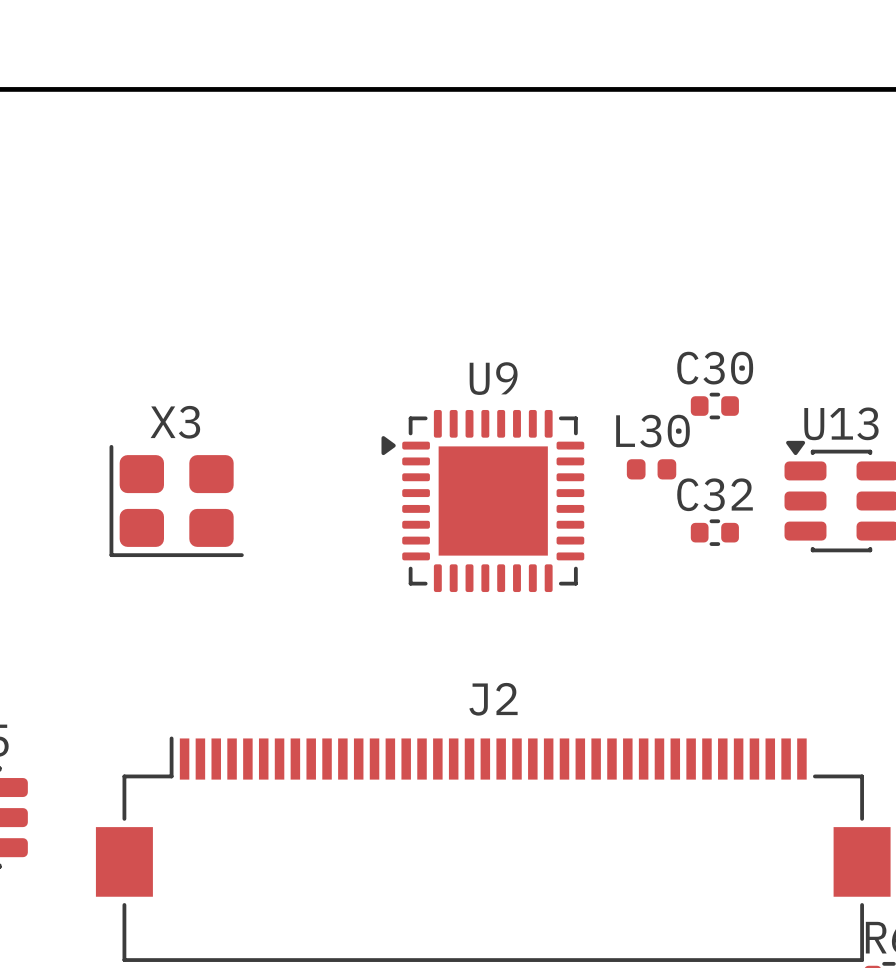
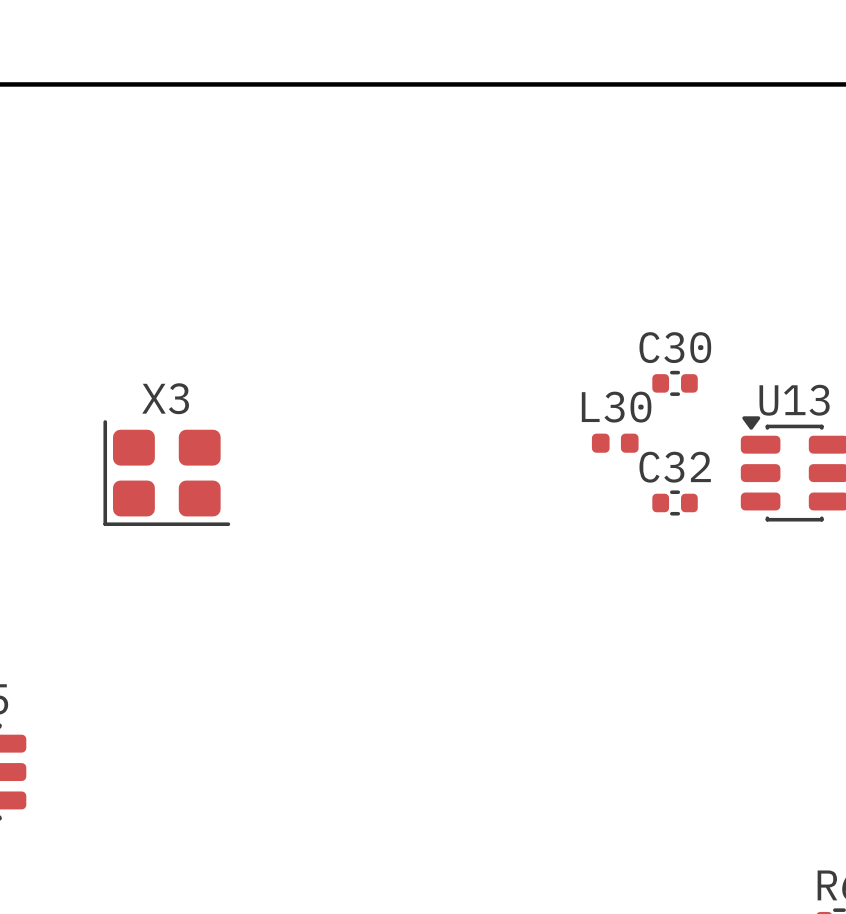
U9: (482, 501) -> none
J2: (493, 849) -> none

